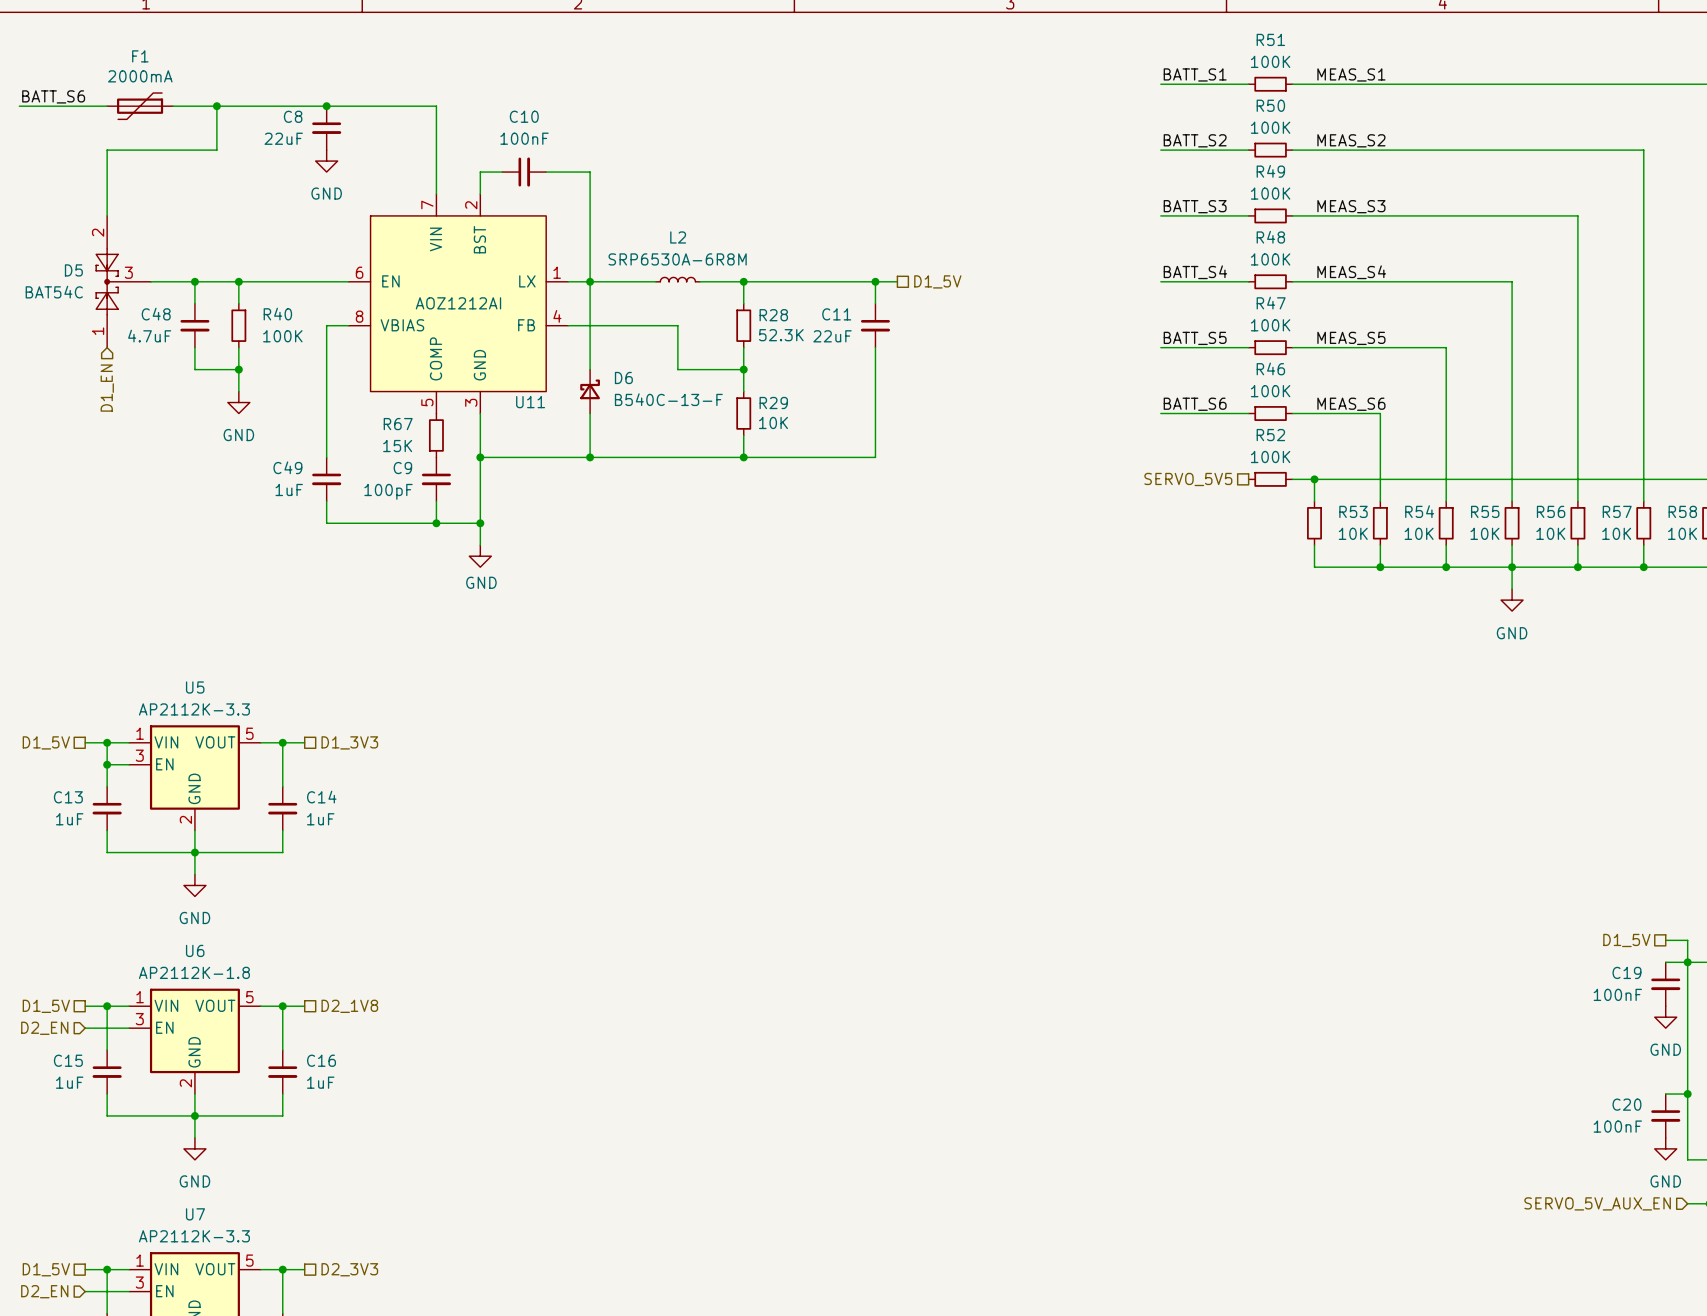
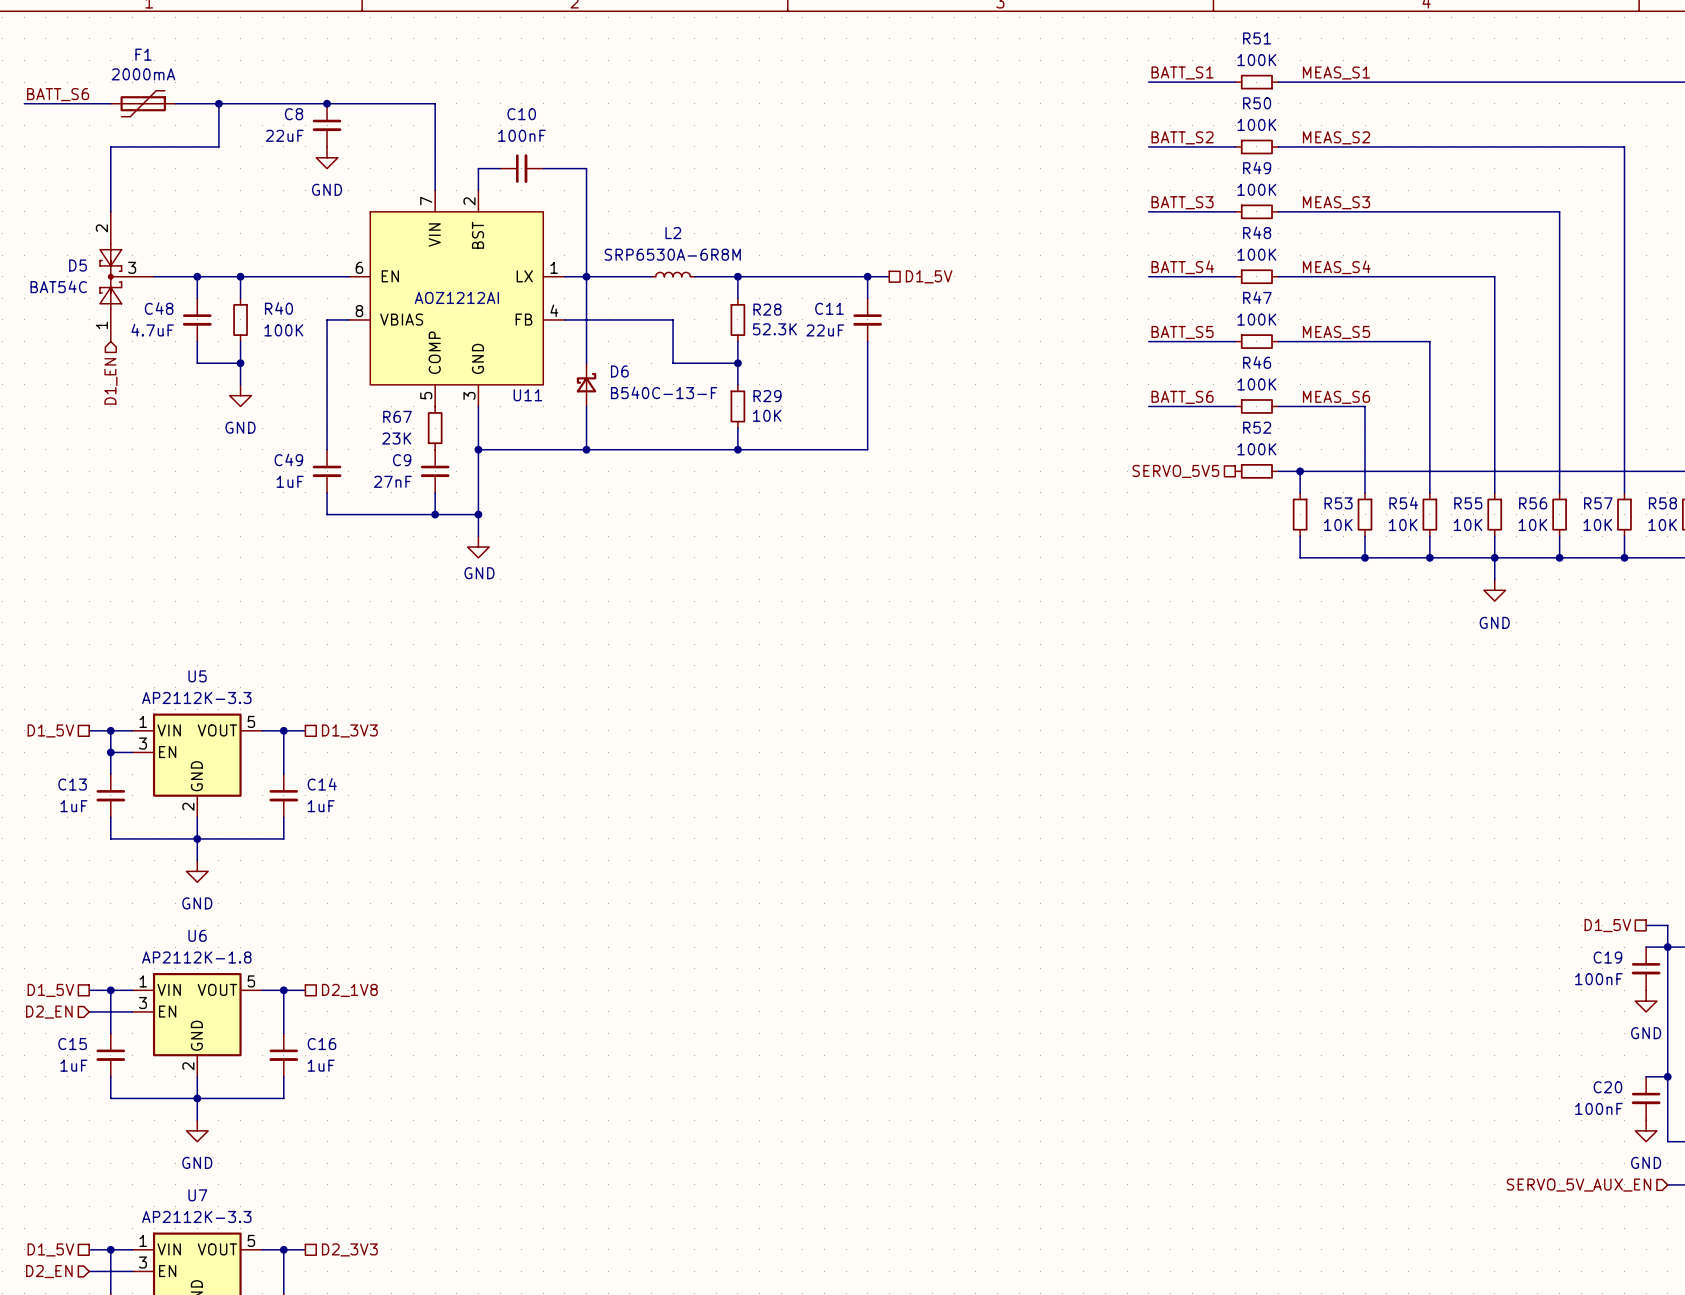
R67 value: 15K (397, 446) -> 23K (396, 438)
C9 value: 100pF (388, 491) -> 27nF (392, 481)

